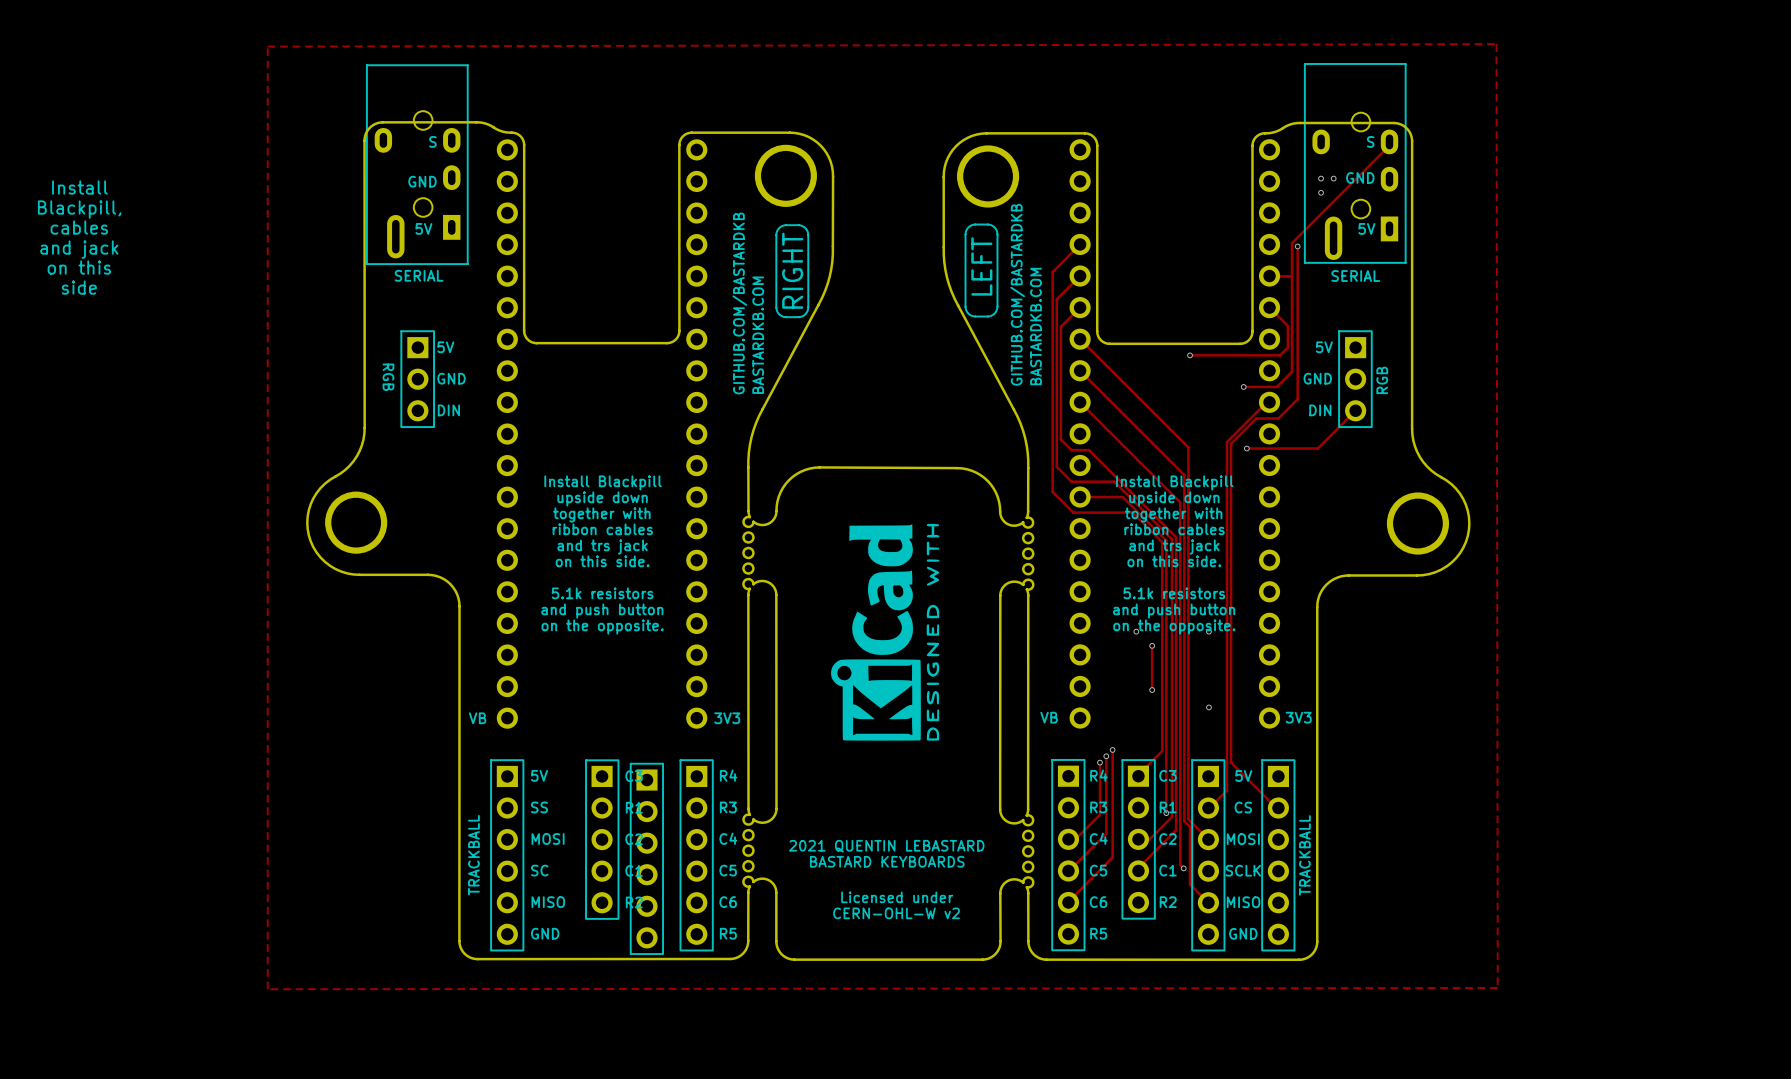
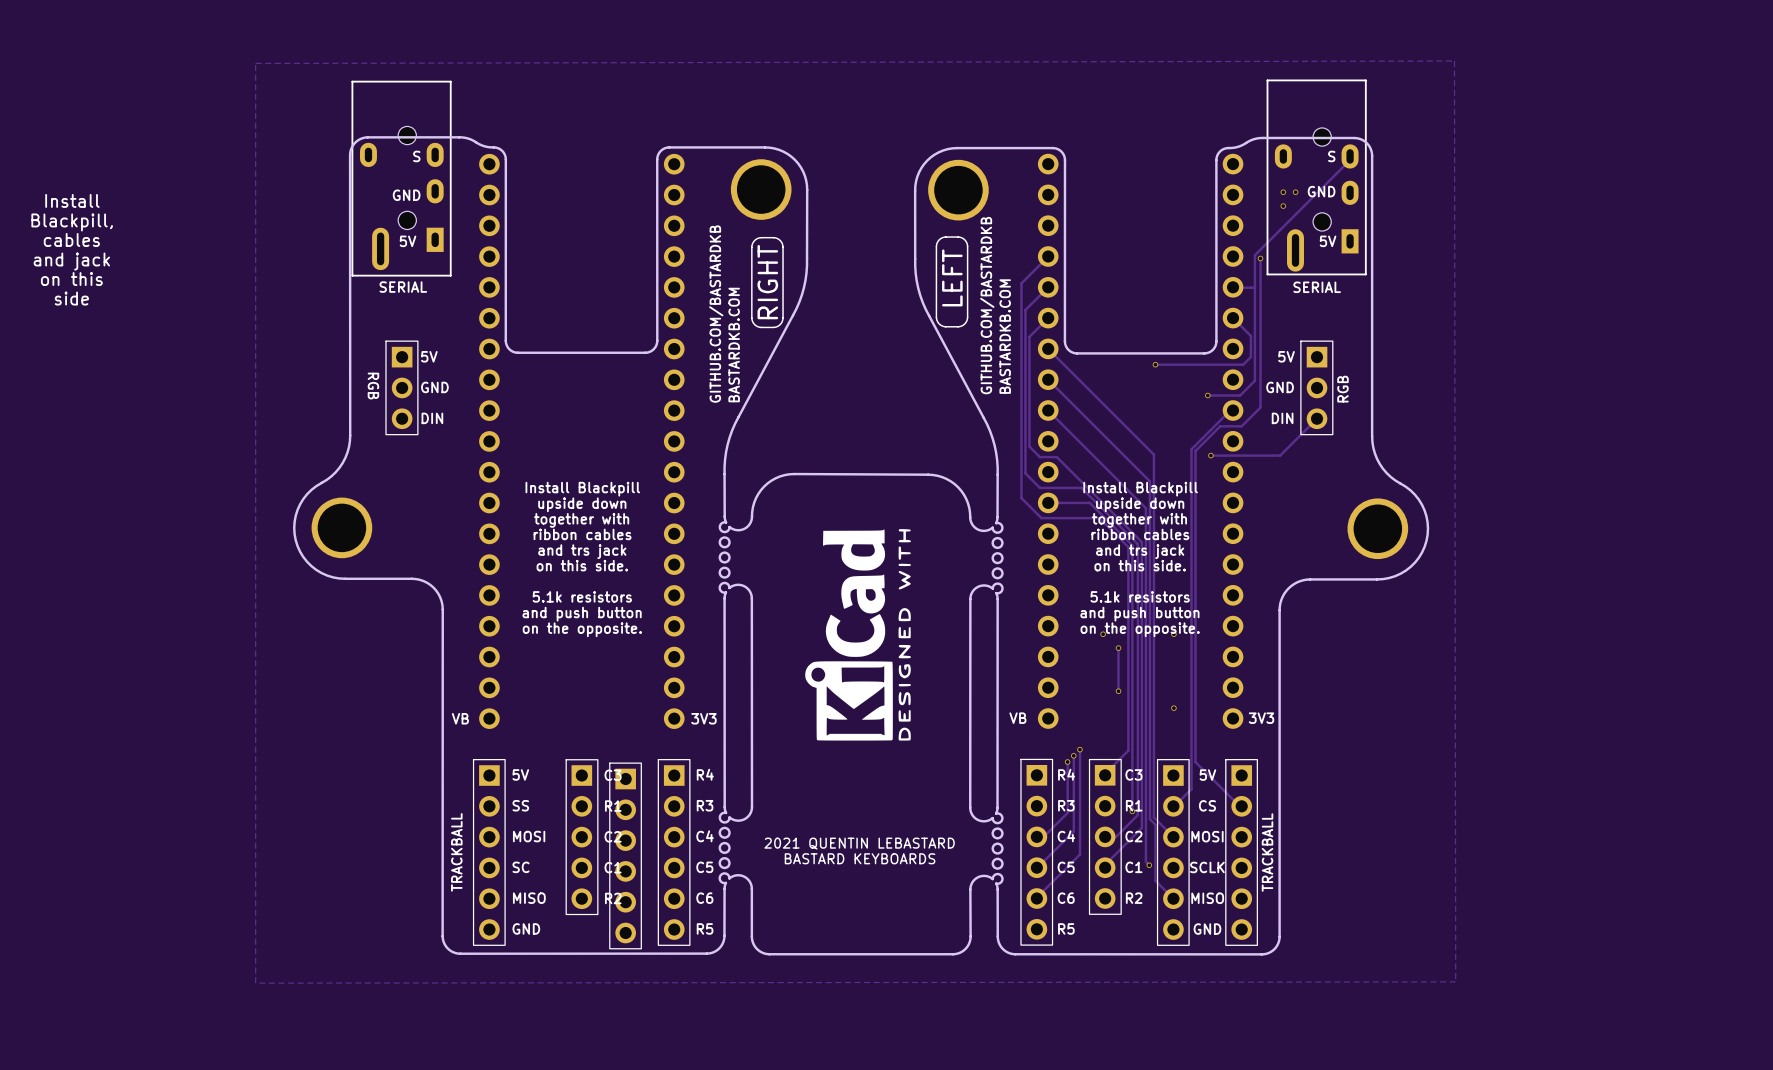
text: Licensed under (897, 897) -> none
text: CERN-OHL-W v2 (896, 913) -> none

